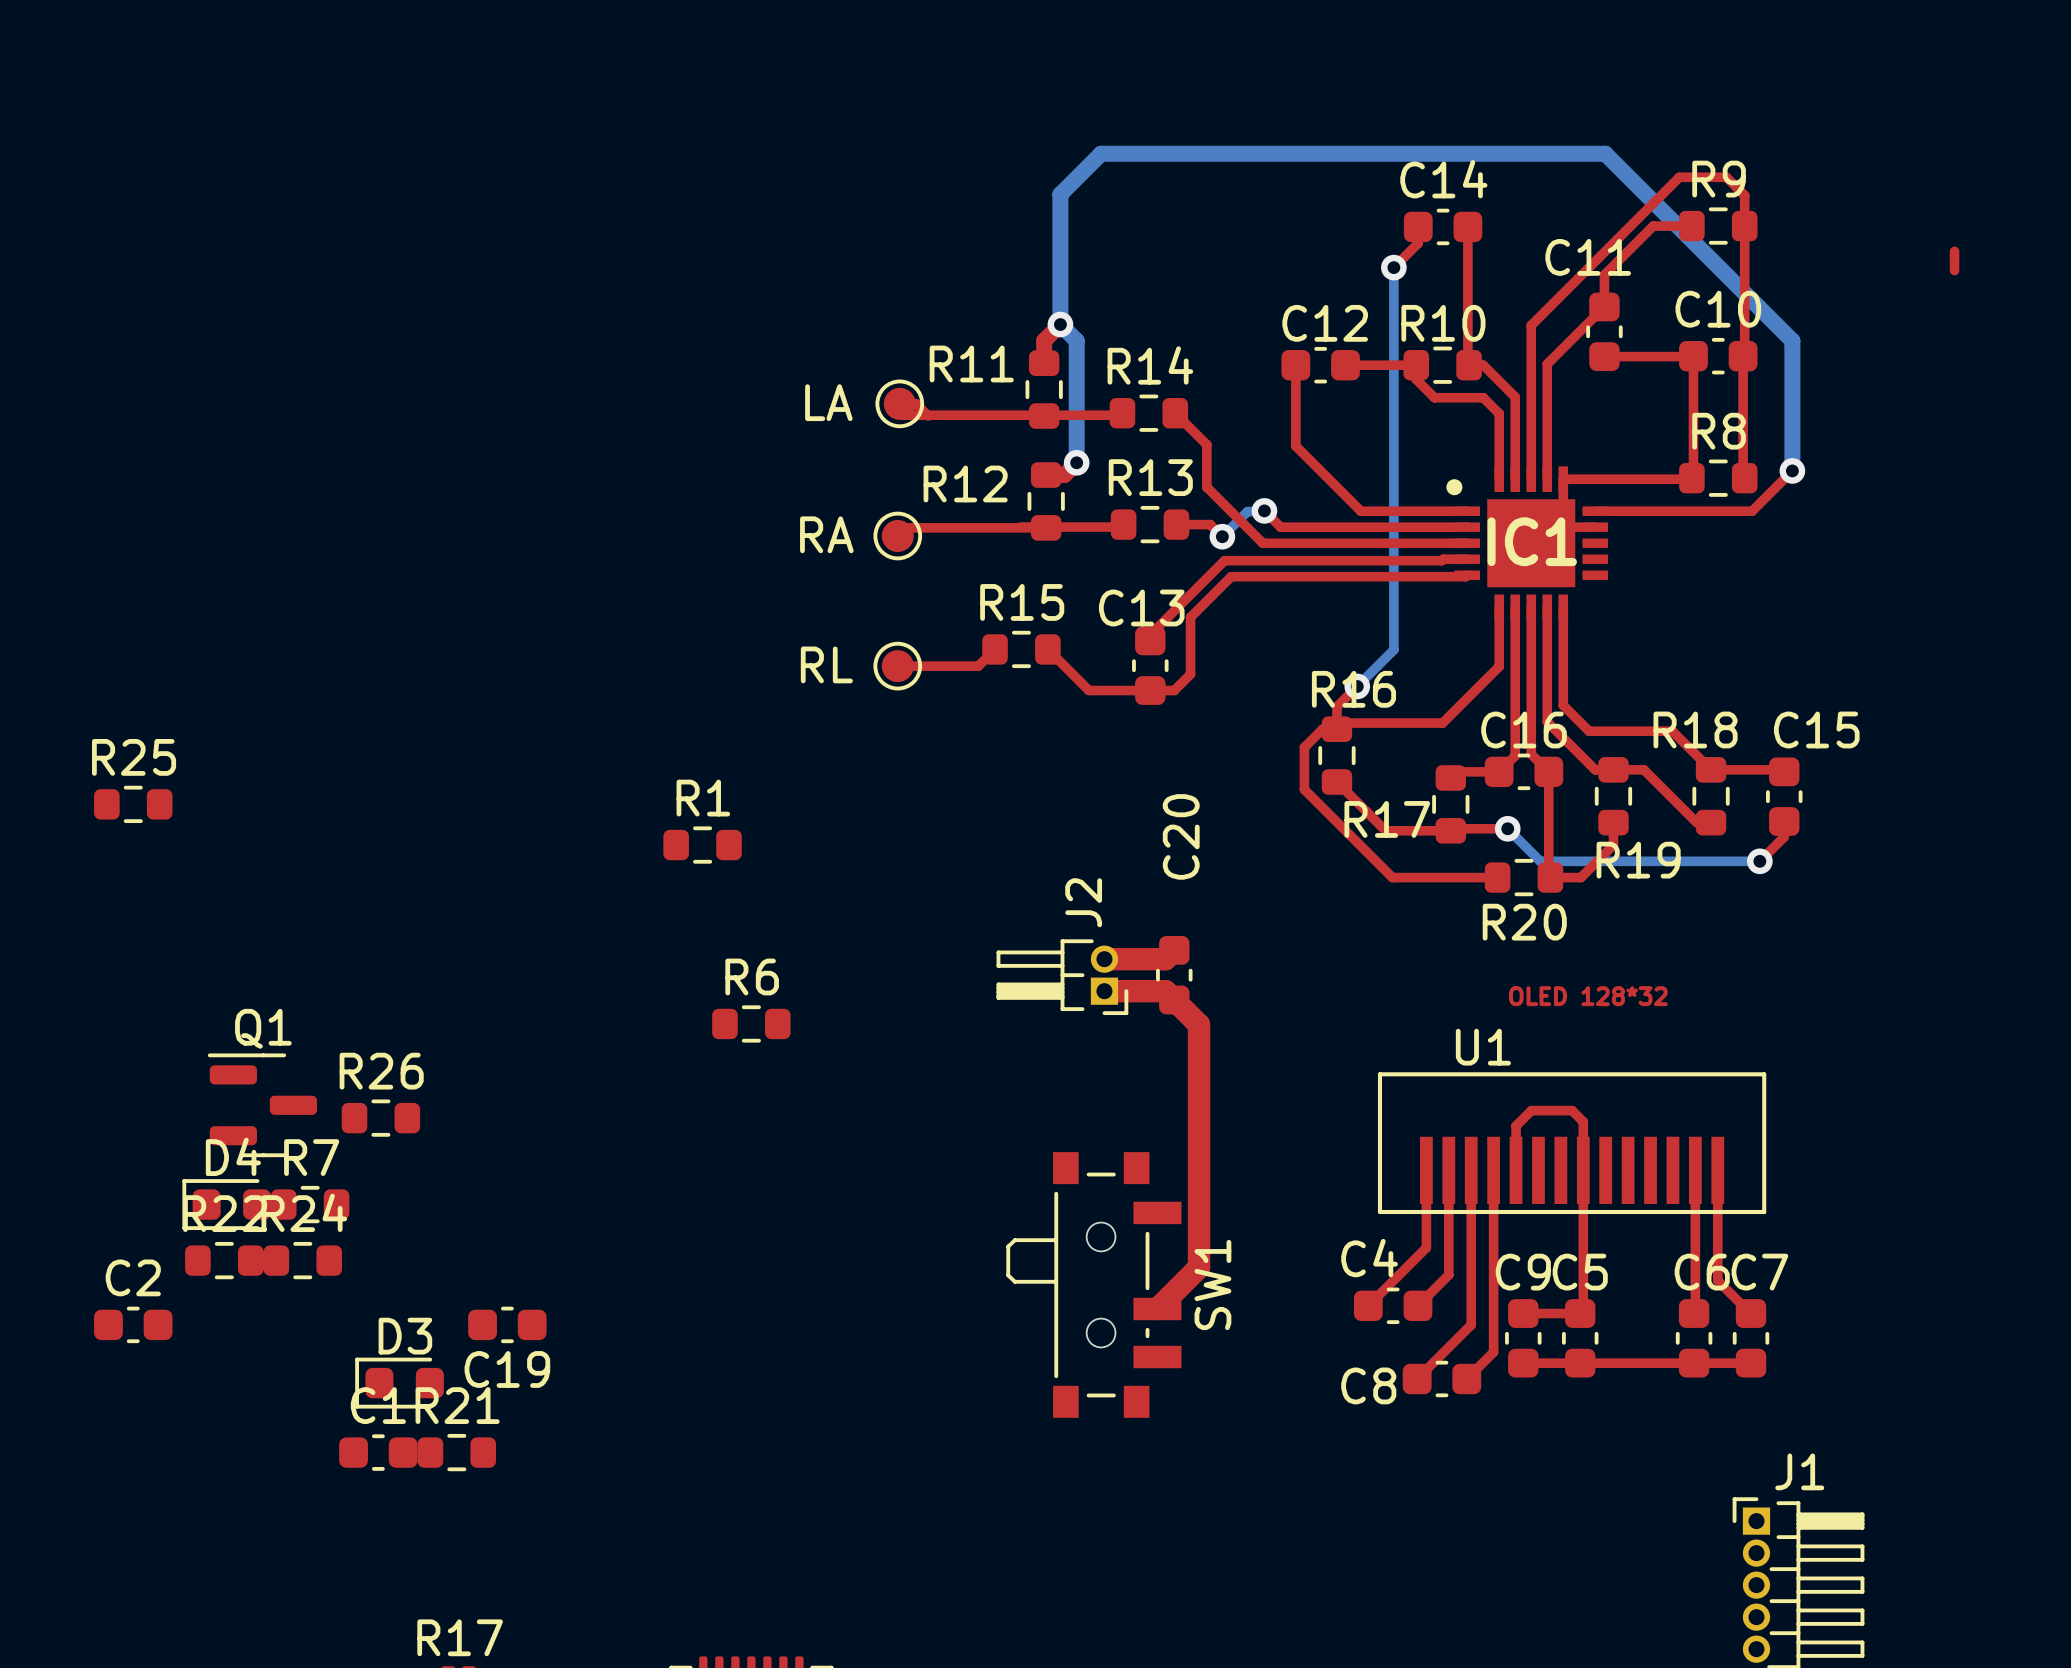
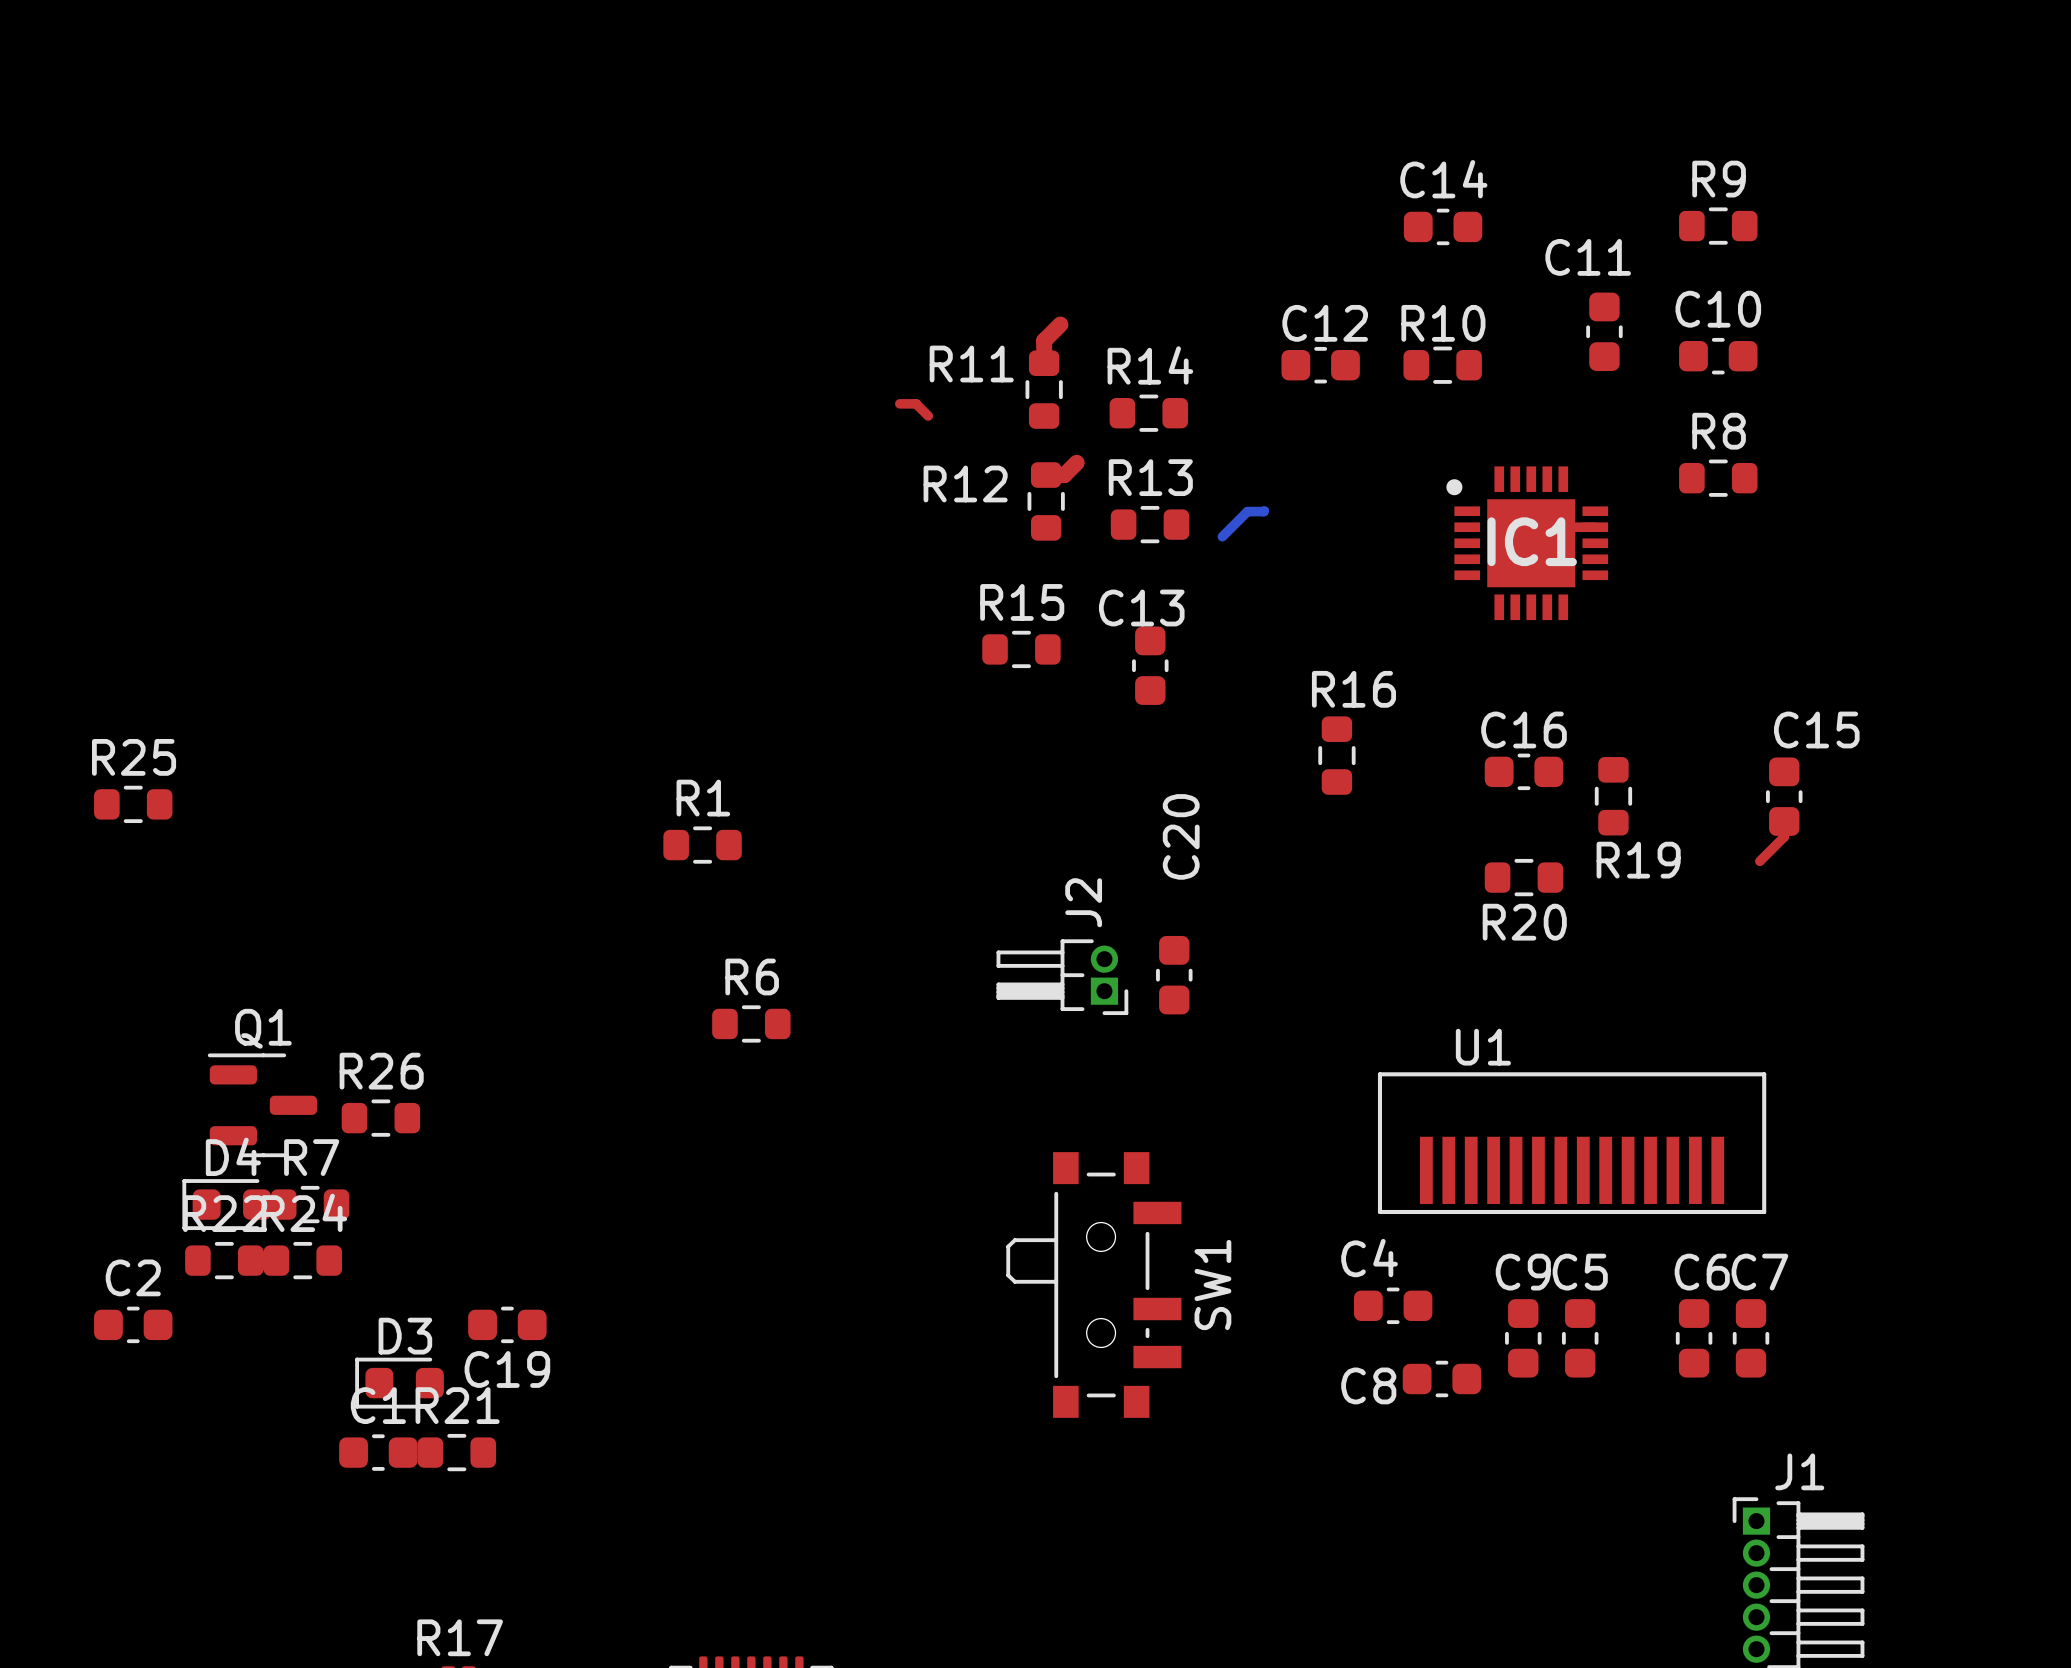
top track: (1418, 226) (1418, 243) (1393, 267) -> none
top track: (1467, 226) (1467, 364) (1475, 371) -> none
top track: (1691, 226) (1653, 226) (1604, 274) (1604, 306) (1547, 364) (1547, 479) -> none
top track: (1954, 251) (1954, 270) -> none
bottom track: (1393, 267) (1393, 649) (1353, 690) -> none
via: (1393, 267) -> none
via: (1060, 324) -> none
top track: (1604, 356) (1693, 356) -> none
top track: (1693, 356) (1693, 476) (1690, 479) (1563, 479) (1563, 511) (1531, 543) -> none
top track: (1295, 365) (1295, 446) (1360, 511) (1467, 511) -> none
top track: (1345, 365) (1416, 365) (1416, 379) (1434, 397) (1483, 397) (1499, 413) (1499, 479) -> none
top track: (1469, 365) (1483, 365) (1515, 397) (1515, 479) -> none
LA: (899, 403) -> none
top track: (1122, 413) (1120, 415) (902, 415) -> none
top track: (1175, 413) (1206, 444) (1206, 487) (1262, 543) (1467, 543) -> none
bottom track: (1076, 462) (1076, 340) (1060, 324) (1060, 194) (1101, 153) (1605, 153) (1792, 340) (1792, 470) -> none
via: (1076, 462) -> none
top track: (1792, 470) (1752, 511) (1595, 511) -> none
via: (1792, 470) -> none
top track: (1744, 478) (1743, 476) (1744, 195) (1726, 177) (1679, 177) (1531, 325) (1531, 479) -> none
top track: (1264, 510) (1280, 527) (1467, 527) -> none
via: (1264, 510) -> none
top track: (1123, 524) (1121, 527) (1020, 527) -> none
top track: (1176, 524) (1210, 524) (1222, 536) -> none
top track: (1046, 527) (905, 527) (897, 535) -> none
RA: (897, 535) -> none
via: (1222, 536) -> none
top track: (1467, 559) (1224, 560) (1150, 634) -> none
top track: (1467, 575) (1231, 576) (1190, 617) (1190, 674) (1174, 690) (1088, 690) (1047, 649) -> none
top track: (1499, 607) (1499, 666) (1442, 723) (1338, 723) -> none
top track: (1515, 607) (1515, 755) (1499, 771) (1452, 771) -> none
top track: (1531, 607) (1531, 754) (1548, 771) (1548, 875) (1550, 877) (1580, 877) (1613, 845) (1613, 822) -> none
top track: (1547, 607) (1547, 721) (1595, 769) (1643, 769) (1696, 822) (1711, 822) -> none
top track: (1563, 607) (1563, 705) (1589, 731) (1672, 731) (1711, 769) (1782, 769) (1784, 771) -> none
top track: (995, 649) (978, 666) (897, 666) -> none
RL: (897, 666) -> none
top track: (1357, 686) (1336, 706) (1336, 729) (1322, 729) (1304, 747) (1304, 789) (1392, 877) (1497, 877) -> none
via: (1357, 686) -> none
top track: (1336, 782) (1385, 830) (1507, 828) -> none
R18: (1711, 796) -> none
R17: (1450, 804) -> none
bottom track: (1507, 828) (1540, 861) (1759, 861) -> none
via: (1507, 828) -> none
via: (1759, 861) -> none
top track: (1174, 950) (1165, 959) (1104, 959) -> none
top track: (1104, 991) (1165, 991) (1199, 1024) (1199, 1267) (1157, 1309) -> none
text: OLED 128*32 (1588, 996) -> none
top track: (1426, 1170) (1426, 1247) (1368, 1305) -> none
top track: (1448, 1170) (1448, 1274) (1417, 1305) -> none
top track: (1471, 1170) (1471, 1324) (1417, 1379) -> none
top track: (1493, 1170) (1493, 1352) (1466, 1379) -> none
top track: (1516, 1170) (1516, 1125) (1531, 1110) (1572, 1110) (1583, 1121) (1583, 1310) (1580, 1313) (1523, 1313) -> none
top track: (1695, 1170) (1694, 1313) -> none
top track: (1717, 1170) (1717, 1280) (1750, 1313) -> none
top track: (1523, 1363) (1751, 1363) -> none

